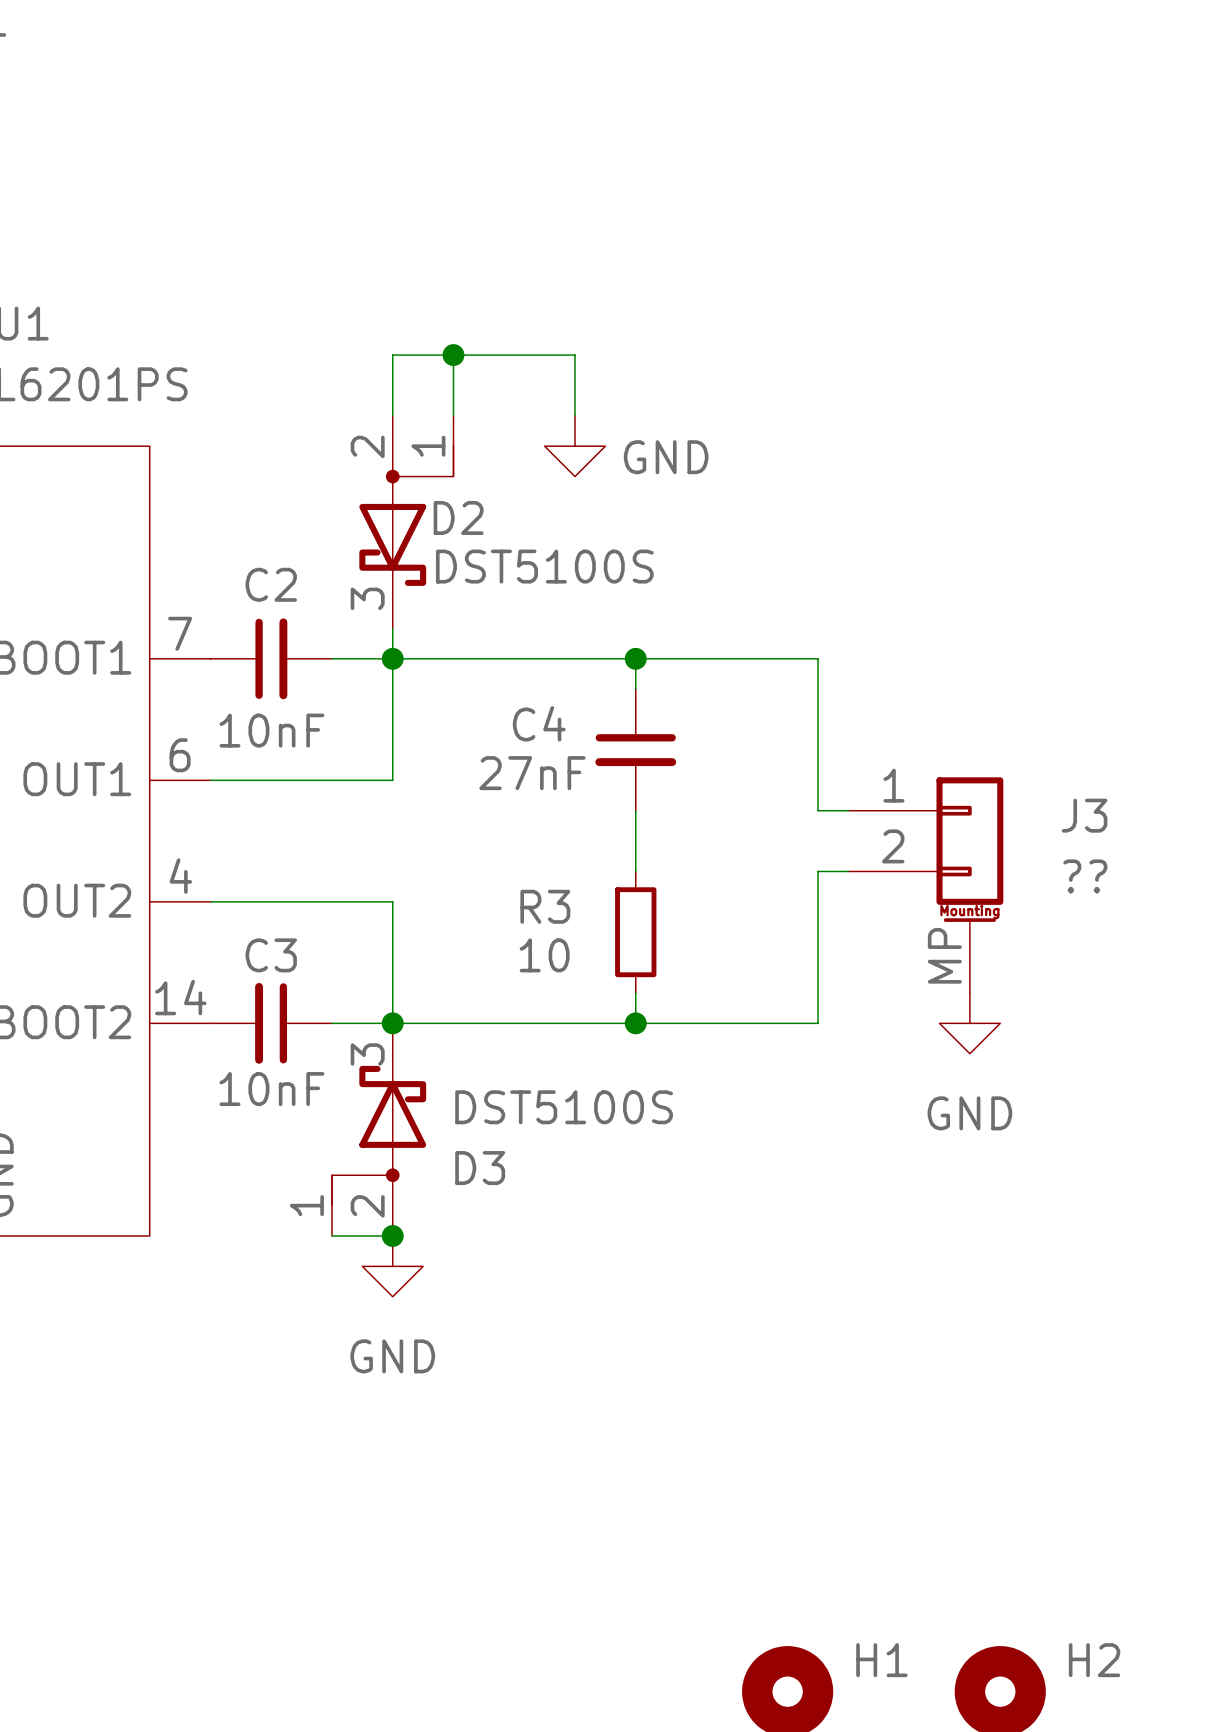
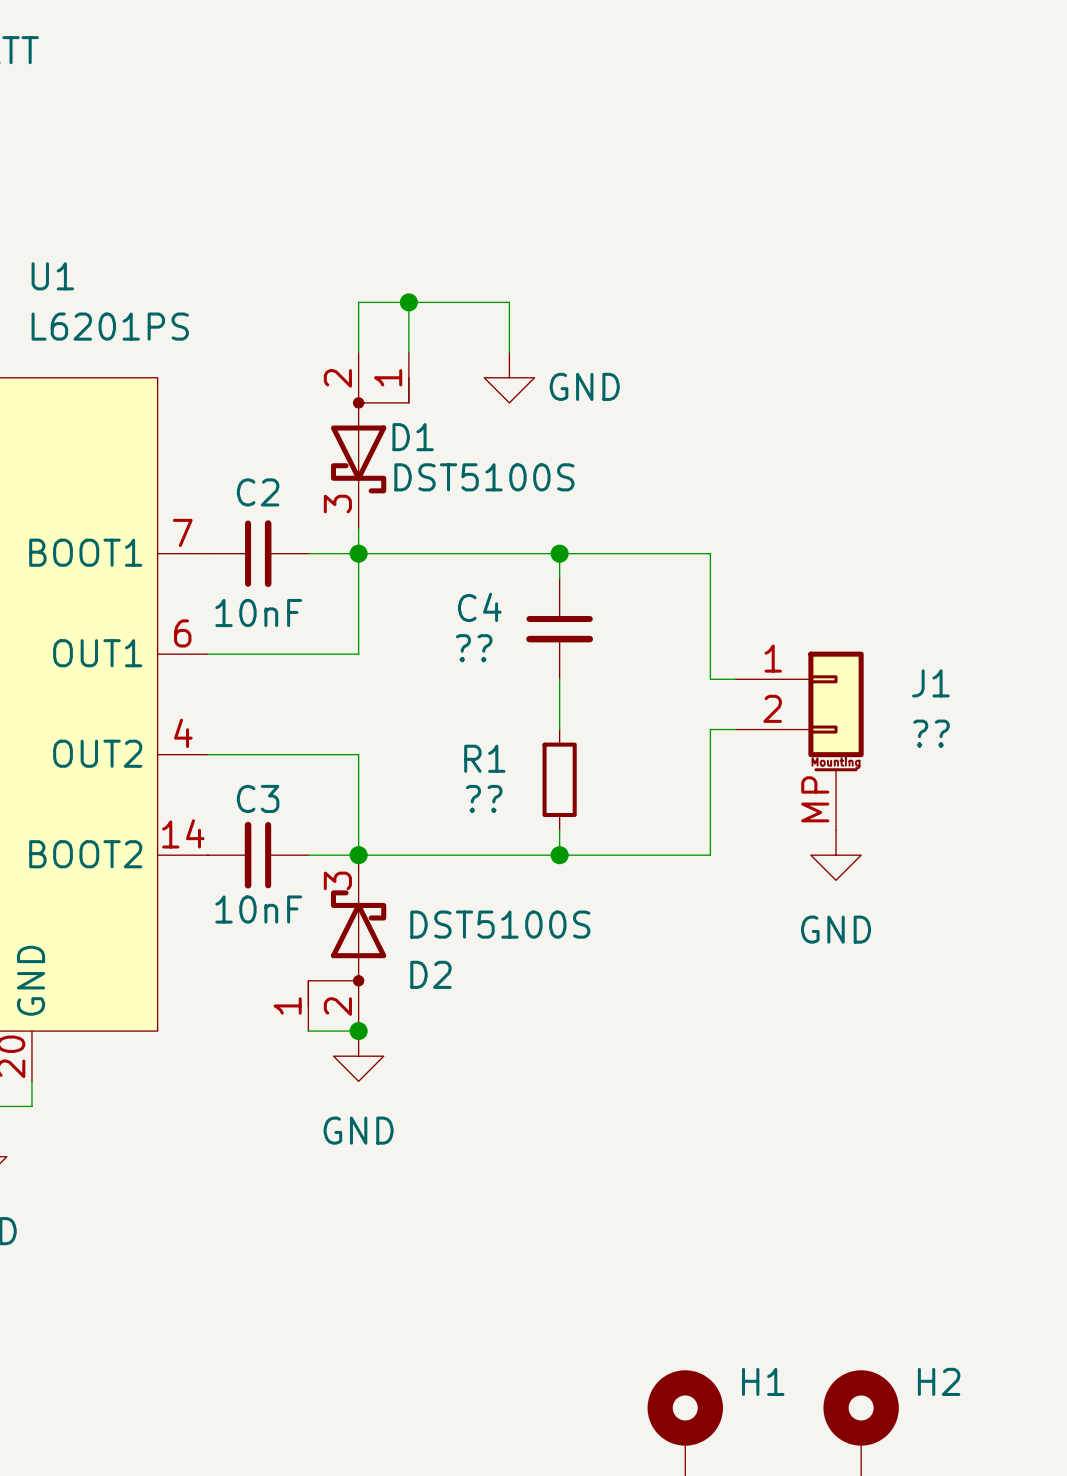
D2 name: D2 (458, 517) -> D1 (413, 437)
C4 value: 27nF (532, 773) -> ?? (474, 648)
J3 name: J3 (1084, 815) -> J1 (930, 683)
R3 name: R3 (545, 906) -> R1 (484, 758)
R3 value: 10 (544, 955) -> ?? (484, 798)
D3 name: D3 (480, 1168) -> D2 (430, 974)

